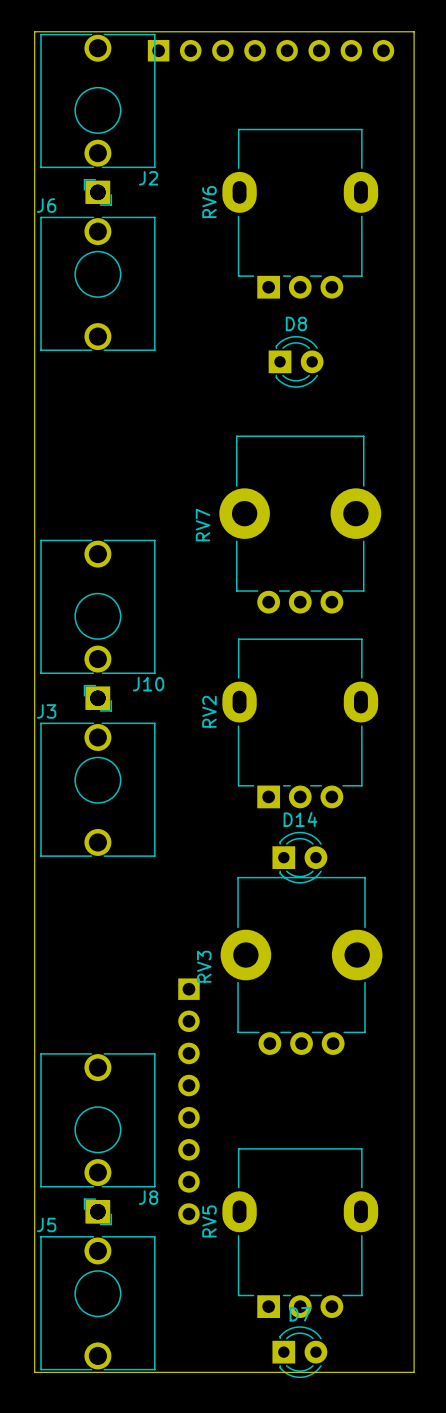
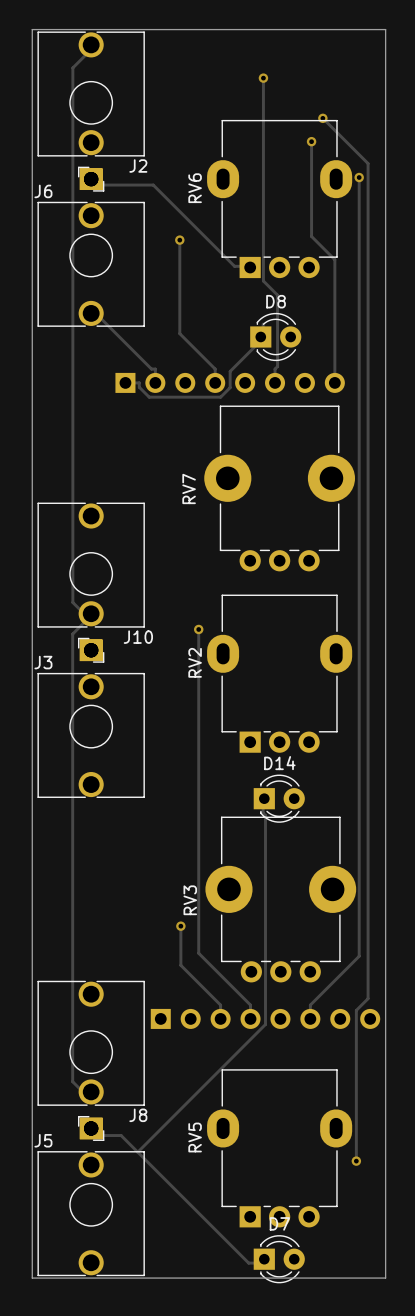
part: (271, 50) -> none
track: none -> (90, 50) (72, 67) (72, 602) (90, 619)
track: none -> (263, 78) (263, 281) (277, 295) (277, 366) (275, 369) (275, 382)
via: none -> (263, 78)
track: none -> (322, 118) (368, 163) (368, 998) (356, 1010) (356, 1161)
via: none -> (322, 118)
track: none -> (311, 141) (311, 236) (334, 259) (334, 382)
via: none -> (311, 141)
track: none -> (90, 173) (90, 185) (153, 185) (234, 266) (249, 266)
track: none -> (359, 177) (359, 956) (310, 1005) (310, 1018)
via: none -> (359, 177)
track: none -> (179, 240) (179, 333) (215, 369) (215, 382)
via: none -> (179, 240)
track: none -> (90, 307) (151, 369) (155, 369) (155, 382)
track: none -> (263, 324) (263, 338) (230, 371) (230, 387) (220, 397) (149, 397) (139, 387) (139, 382) (125, 382)
part: none -> (230, 382)
track: none -> (88, 618) (72, 634) (72, 1081) (90, 1099)
track: none -> (198, 629) (198, 953) (250, 1005) (250, 1018)
via: none -> (198, 629)
track: none -> (263, 798) (263, 813) (265, 815) (265, 1024) (137, 1152)
track: none -> (180, 926) (180, 965) (220, 1005) (220, 1018)
via: none -> (180, 926)
part rotation: 0° (188, 1101) -> 90° counterclockwise (265, 1018)
track: none -> (90, 1124) (90, 1135) (121, 1135) (248, 1263) (263, 1263)
via: none -> (356, 1161)

